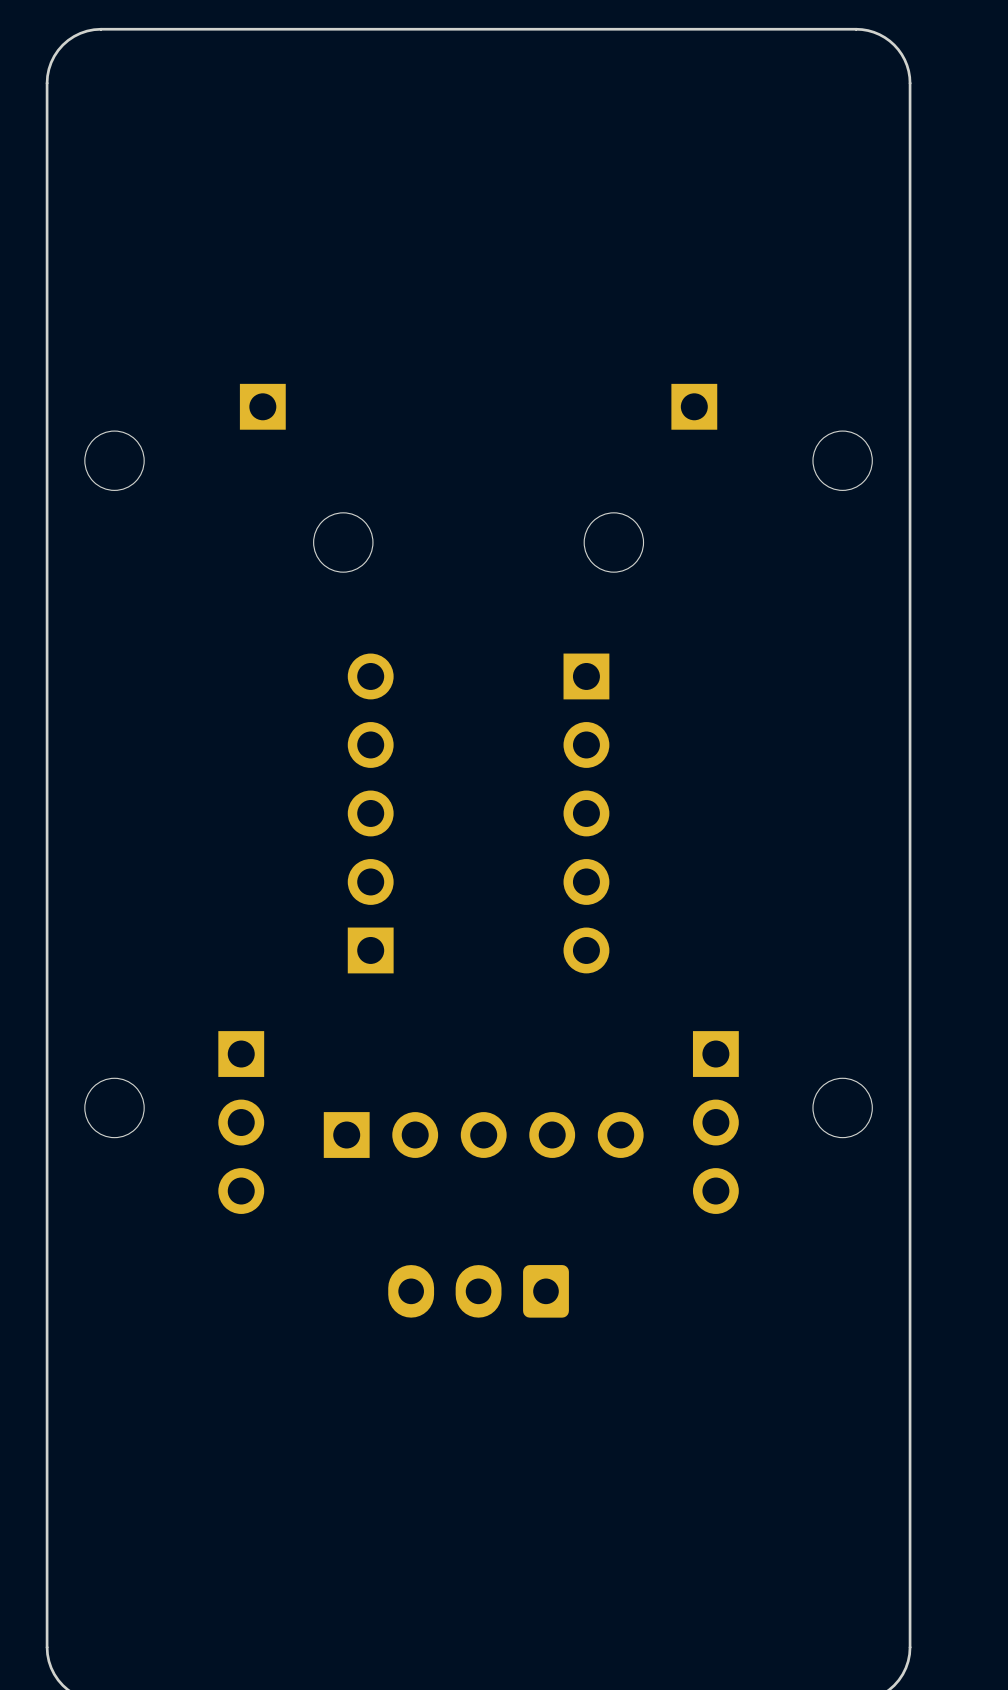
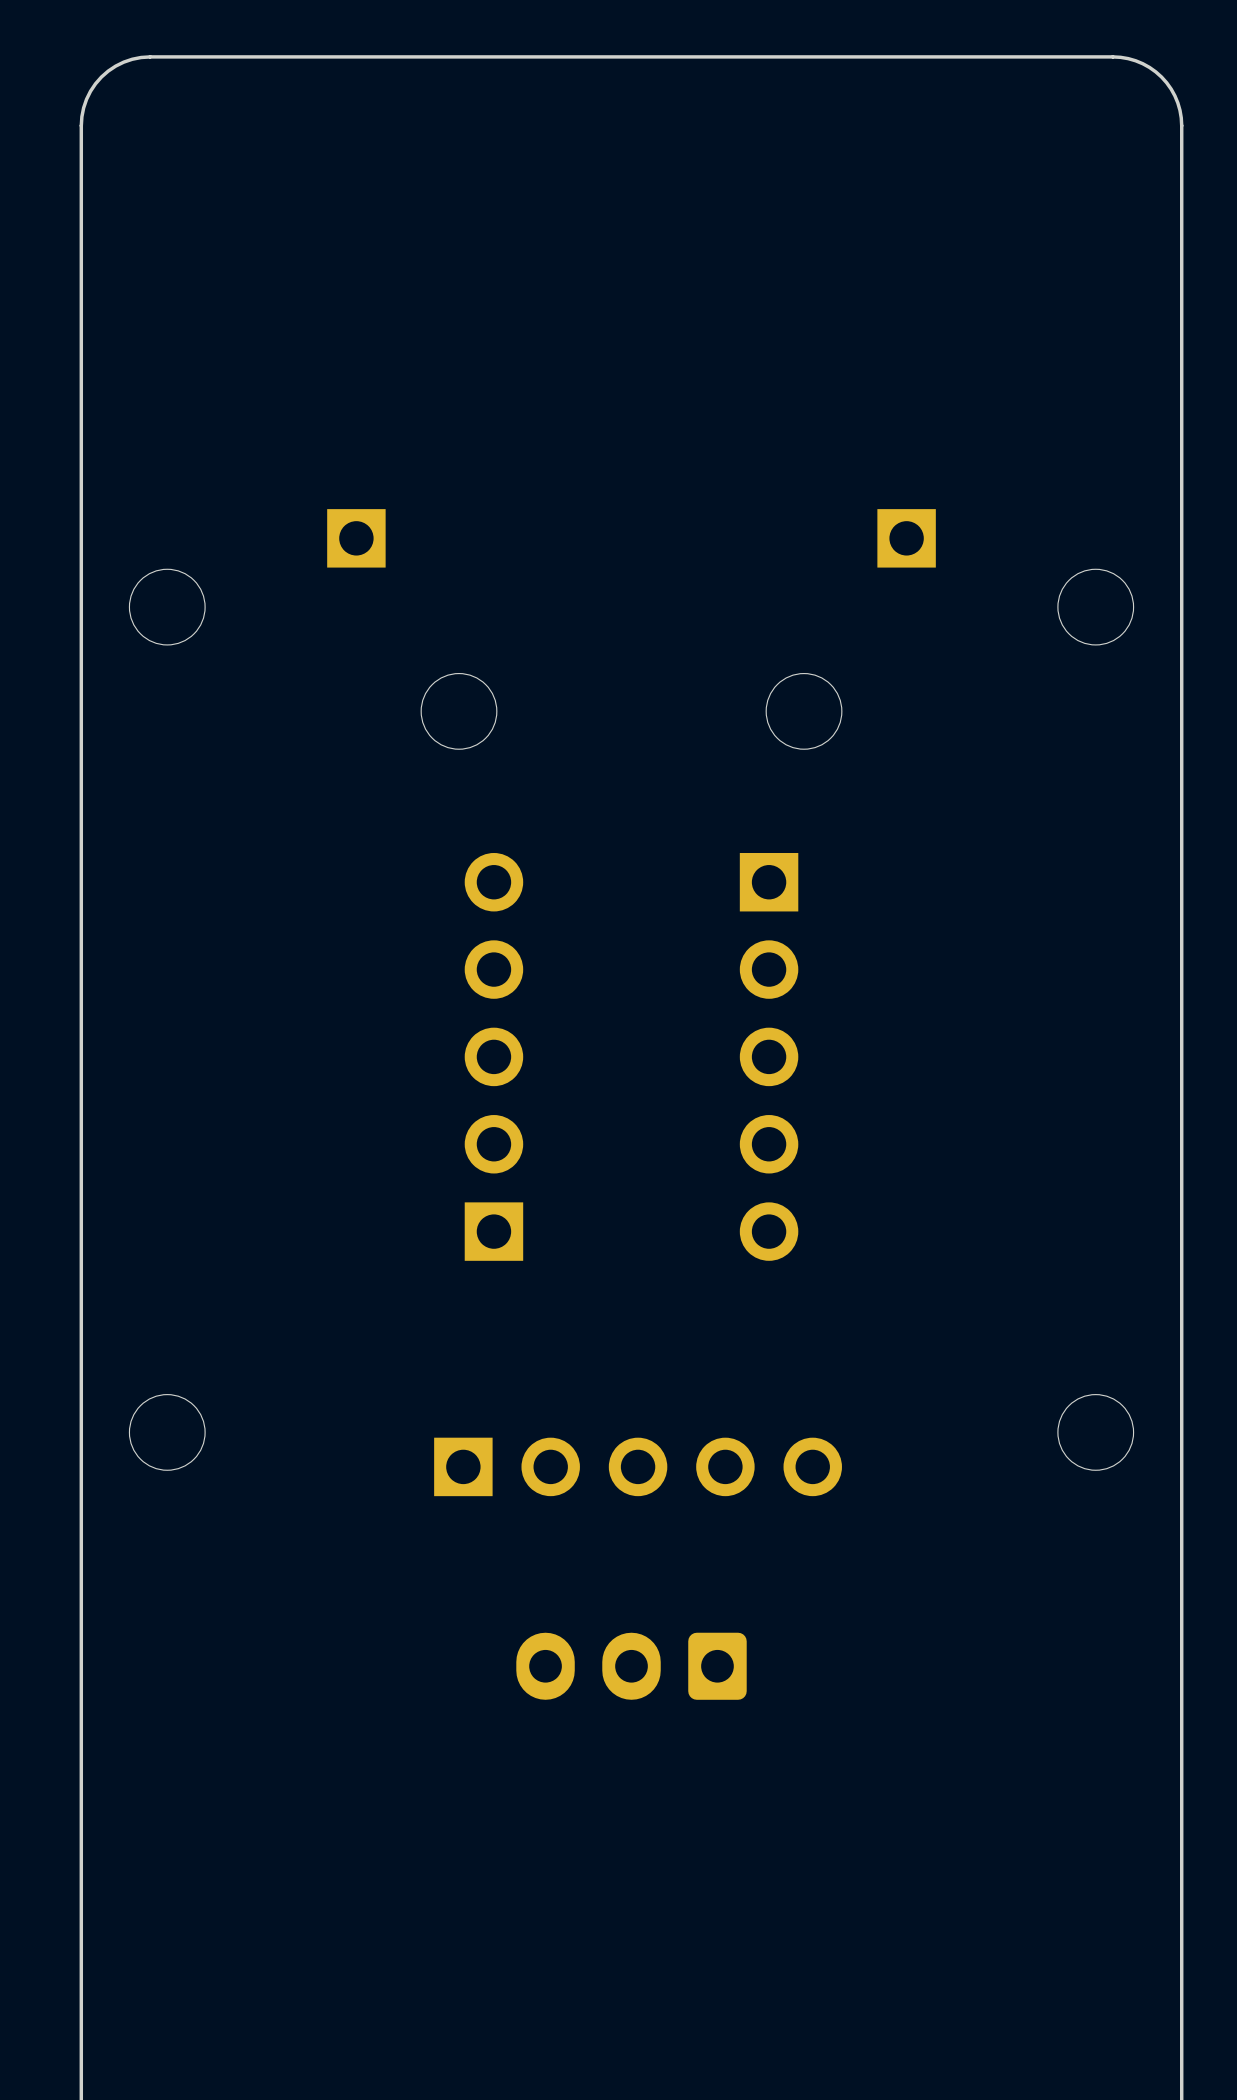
part: (241, 1122) -> none
part: (715, 1122) -> none

